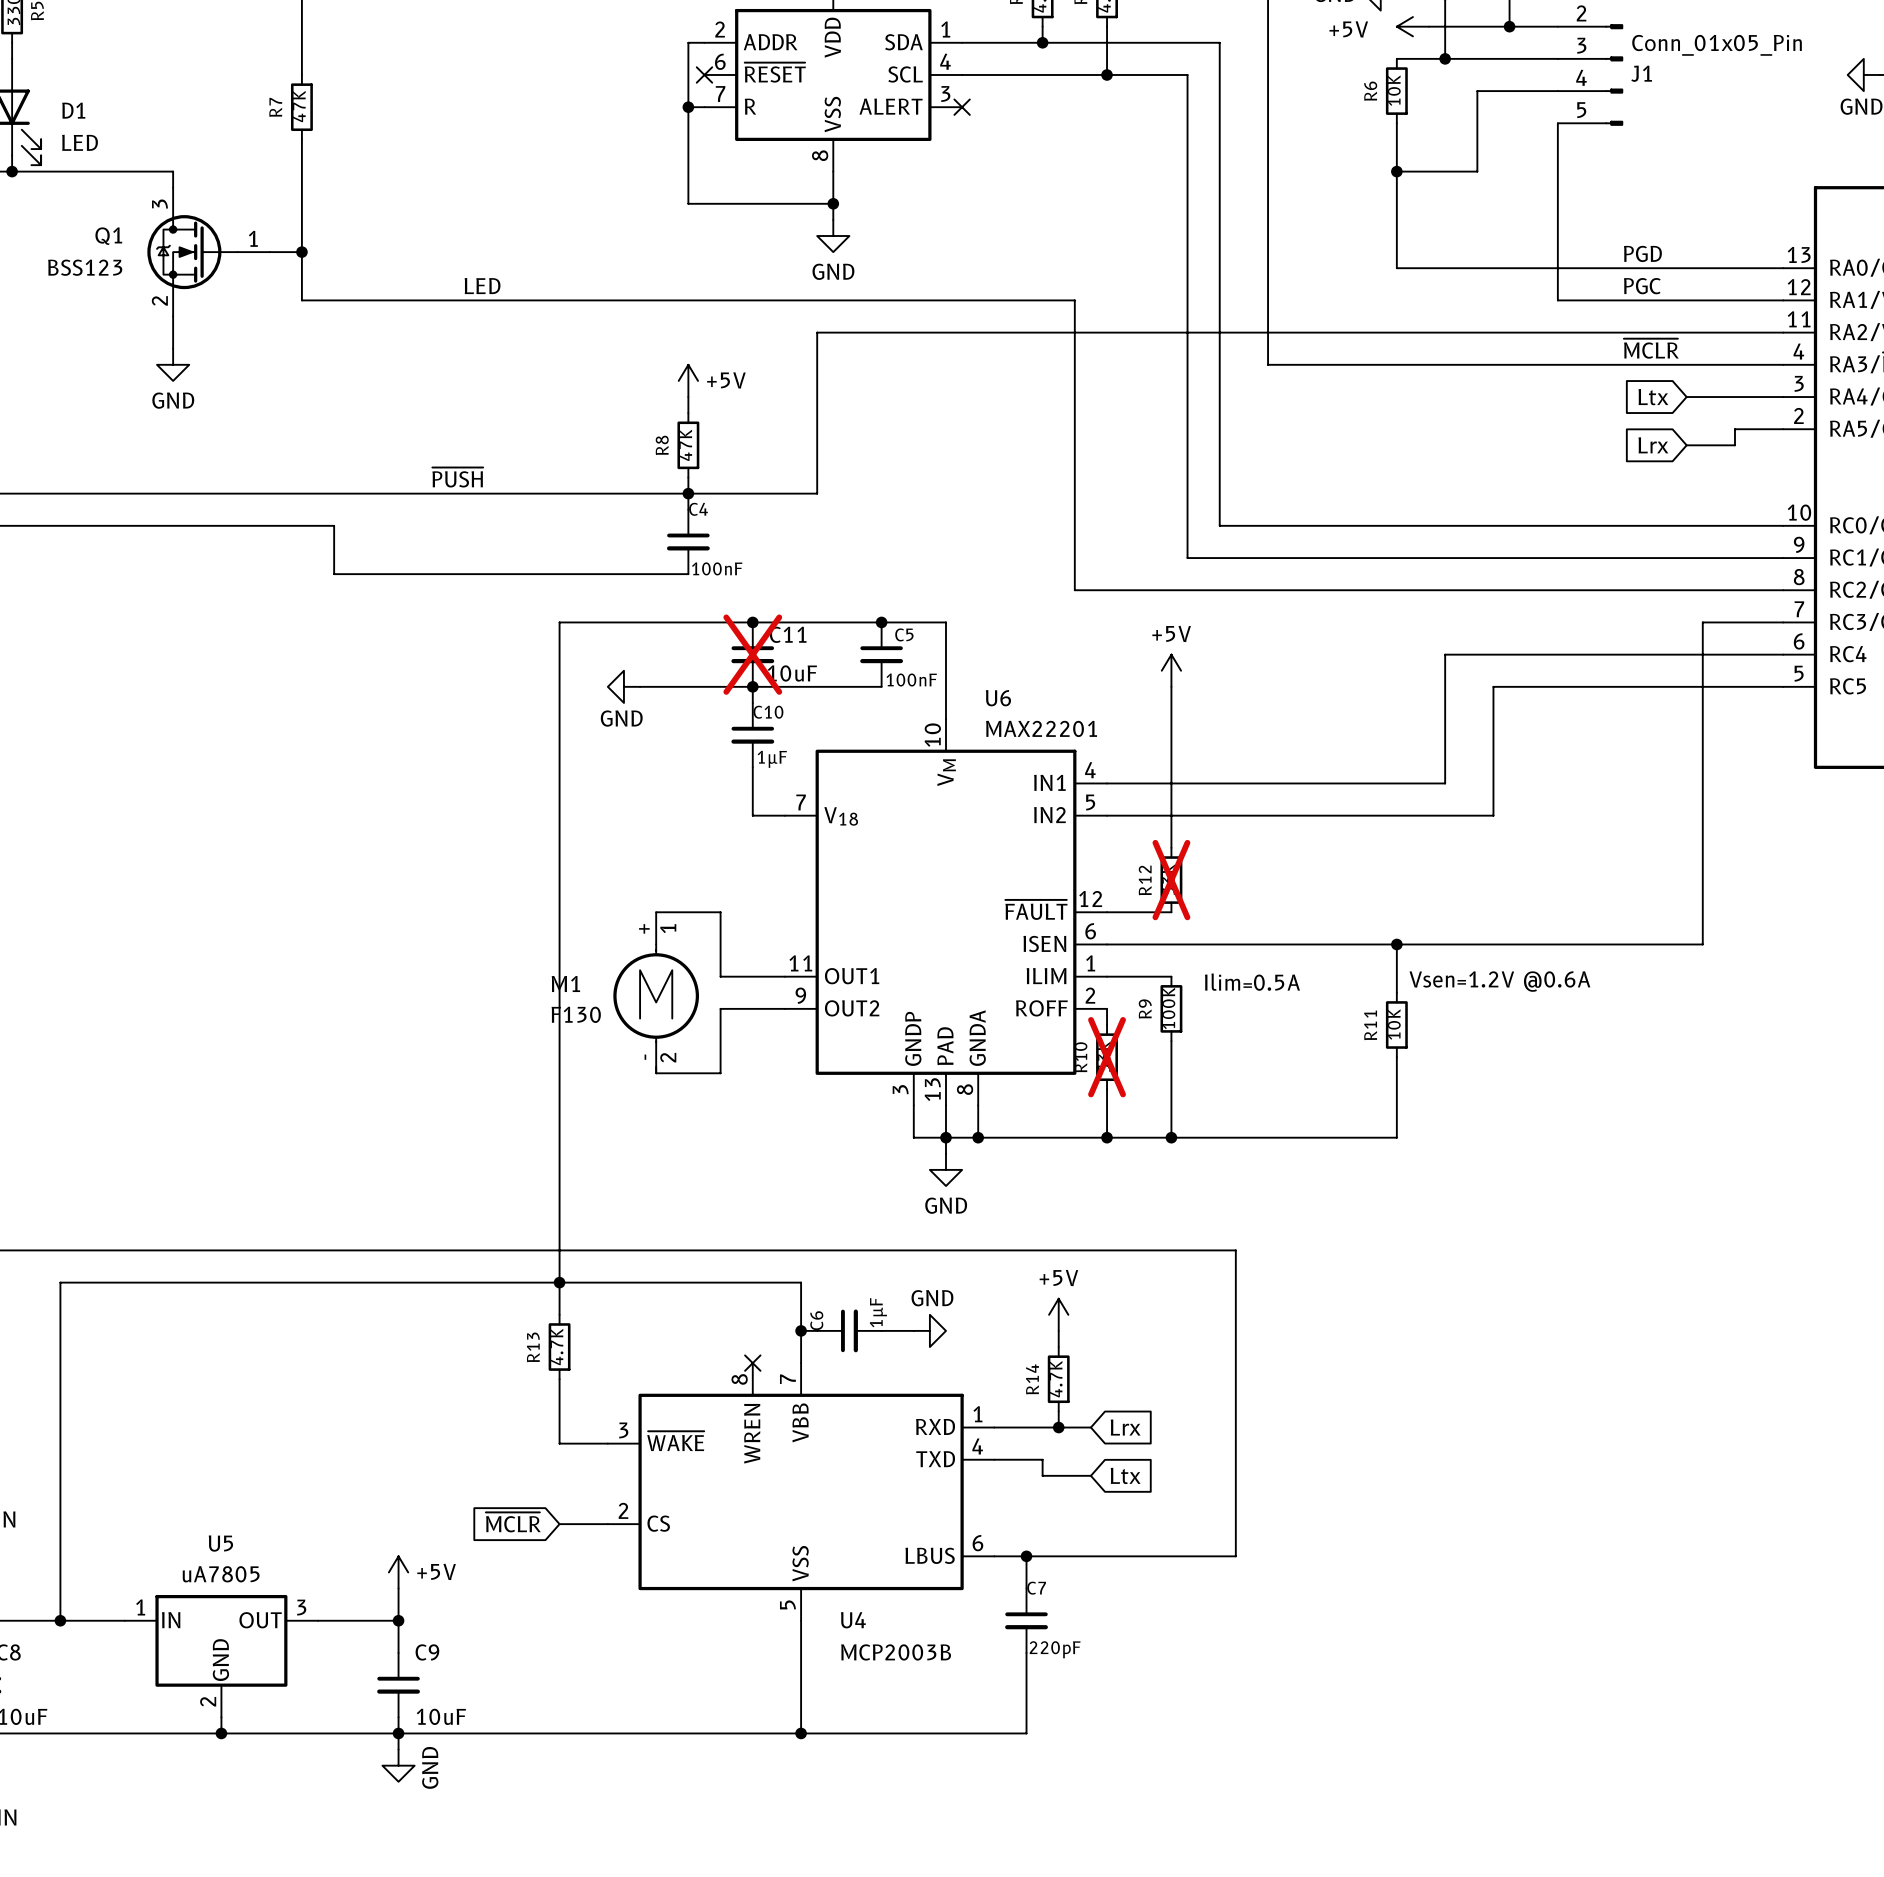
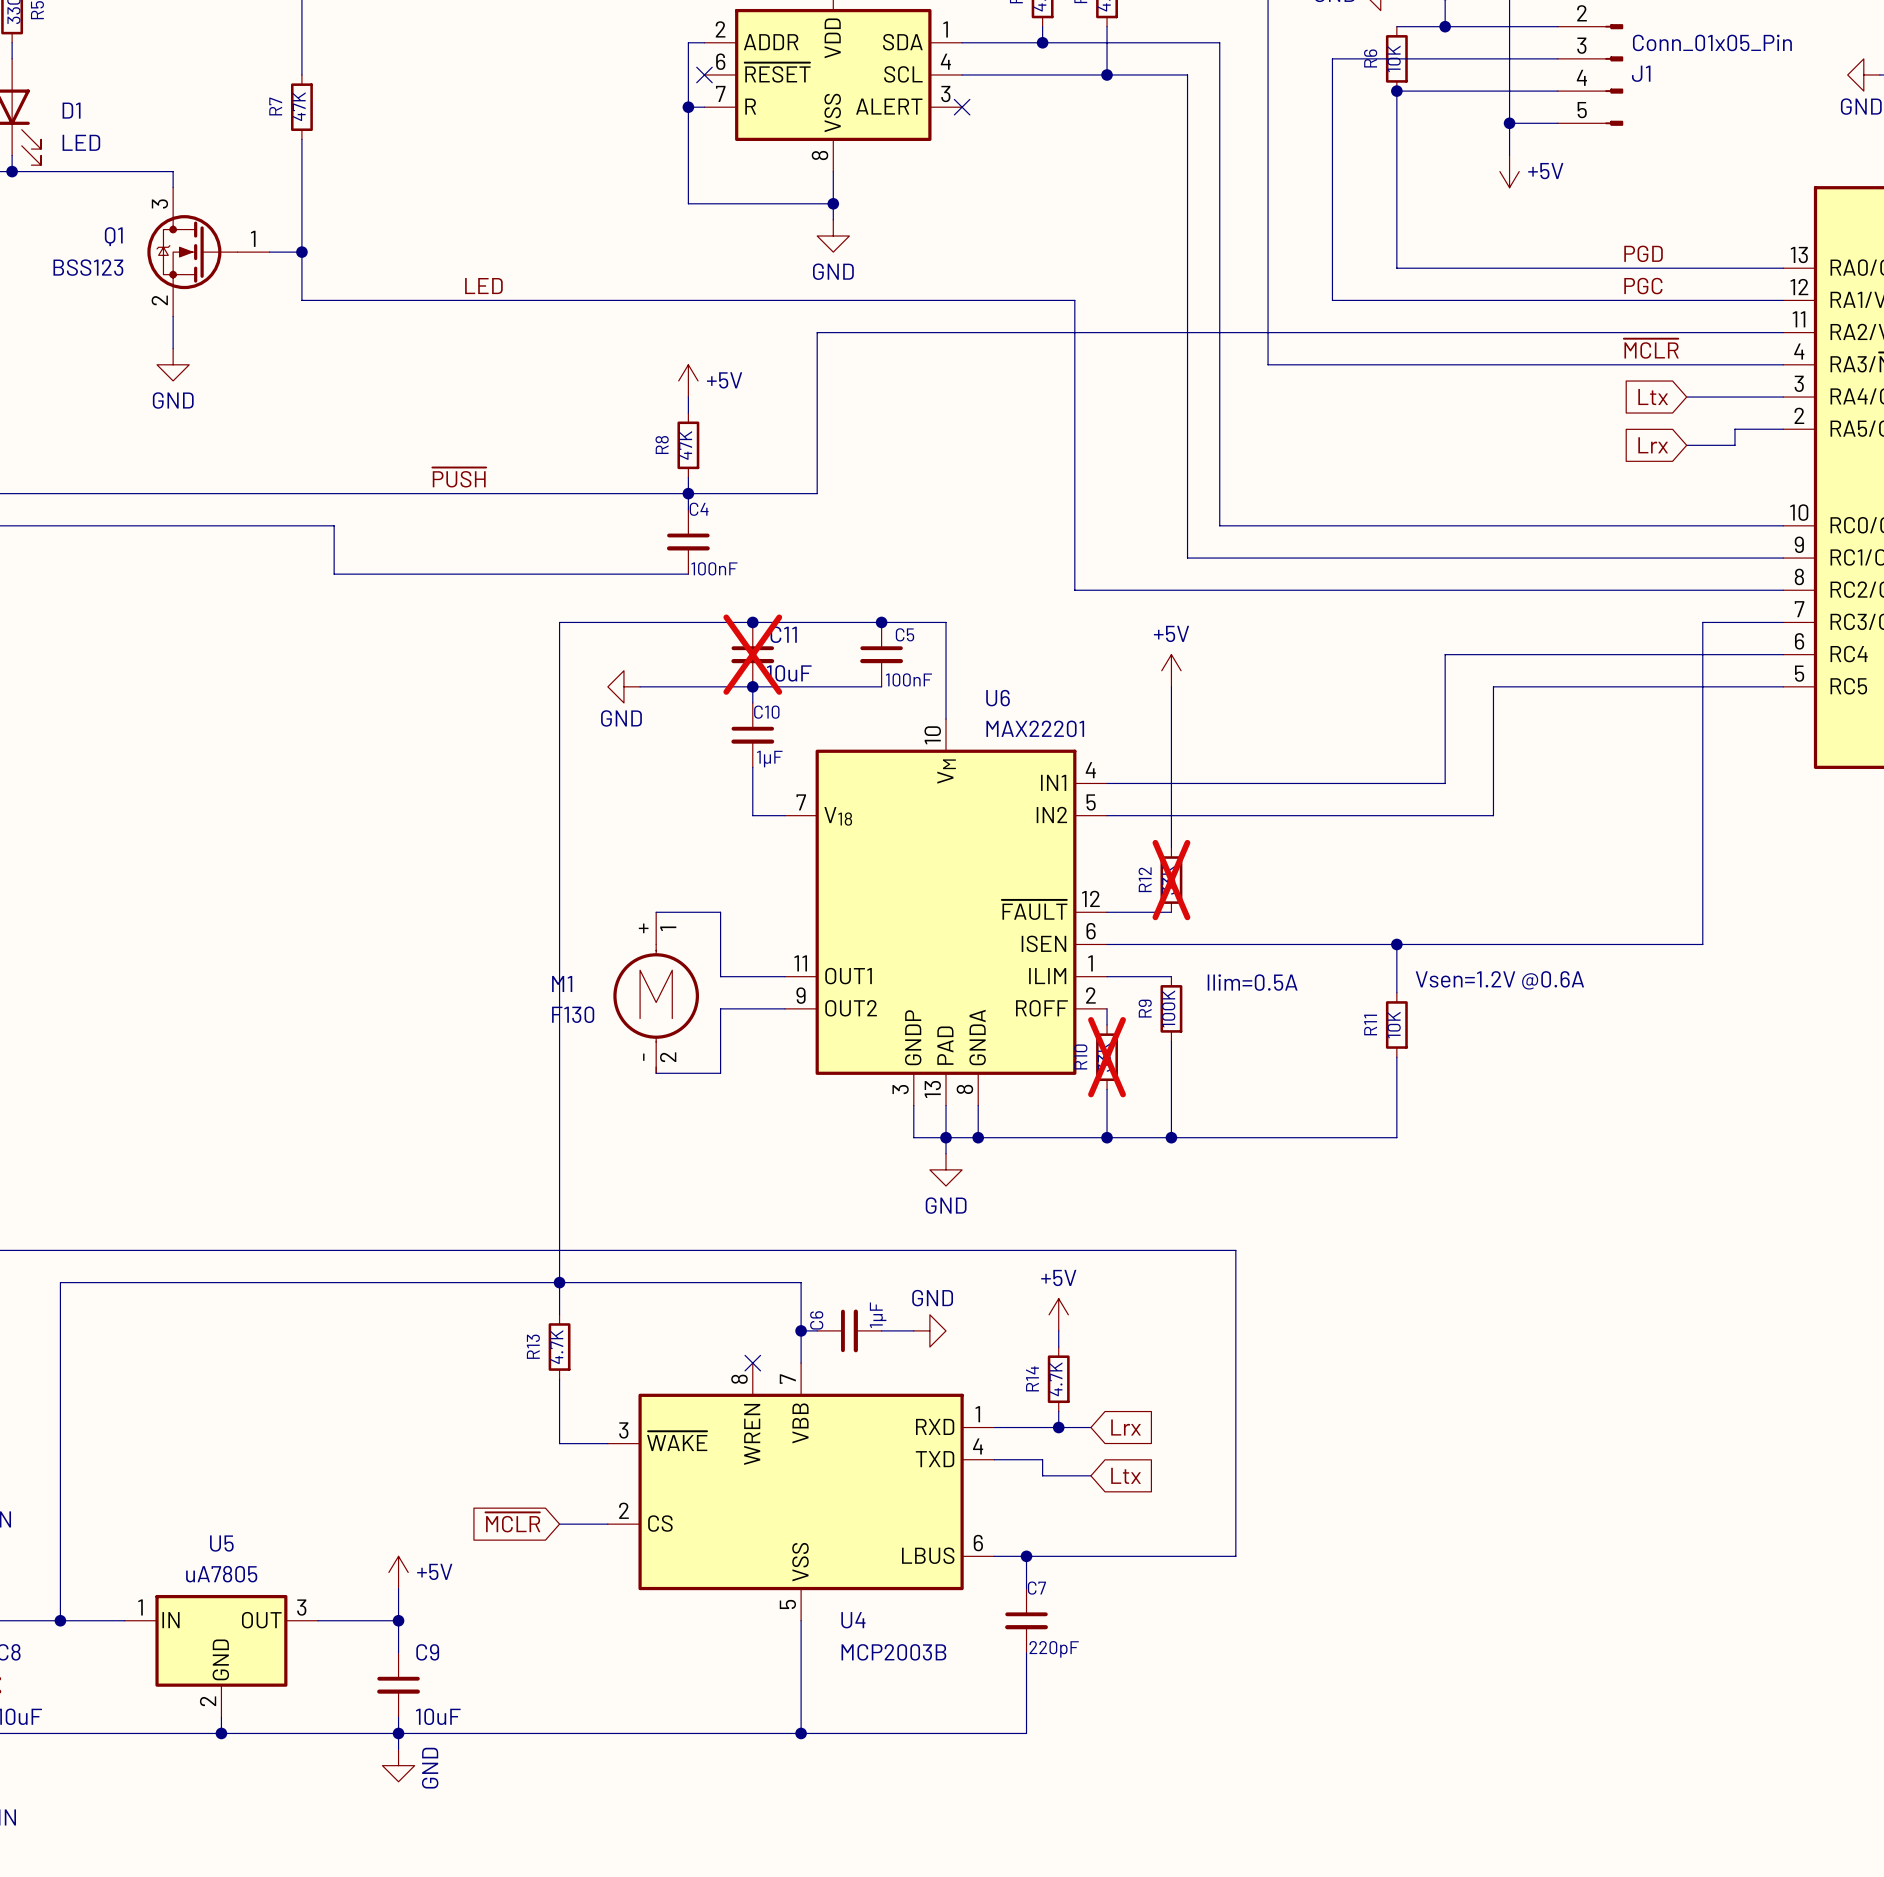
power symbol rotation: 0° (1412, 26) -> 90° counterclockwise (1509, 171)
power symbol position: +5V (1412, 26) -> +5V (1509, 171)
wire: (1445, 26) (1445, 58) -> none
junction: none -> (1445, 26)
wire: none -> (1509, 26) (1509, 155)
junction: (1509, 26) -> none
power symbol text position: +5V (1348, 29) -> +5V (1545, 171)
junction: (1445, 58) -> none
junction: none -> (1396, 91)
R6 position: (1396, 91) -> (1396, 58)
wire: (1477, 91) (1477, 171) (1396, 171) -> (1477, 91) (1396, 91) (1396, 123)
wire: none -> (1509, 123) (1557, 123)
junction: none -> (1509, 123)
wire: (1557, 123) (1557, 300) -> (1396, 58) (1332, 58) (1332, 300) (1557, 300)
junction: (1396, 171) -> none

